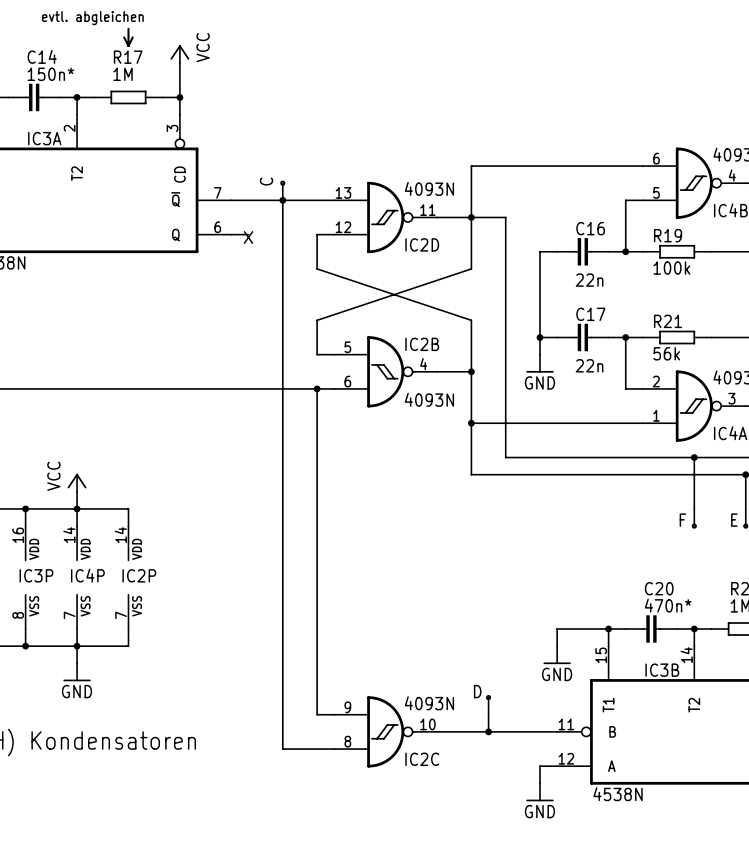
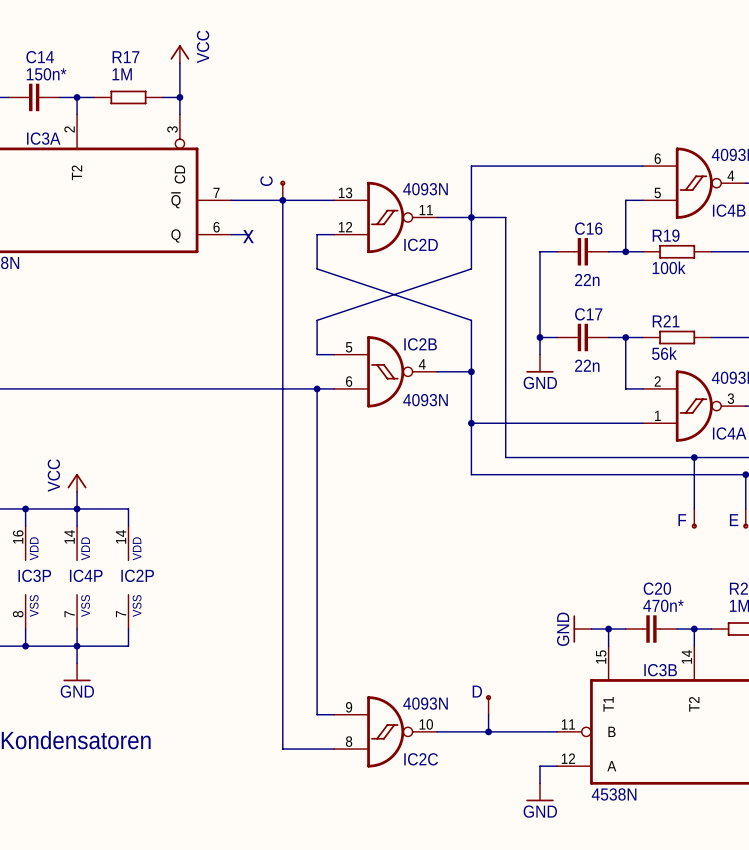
text: evtl. abgleichen (92, 18) -> none
line: (128, 28) (128, 46) -> none
line: (124, 37) (128, 46) -> none
line: (132, 37) (128, 46) -> none
power symbol position: GND (557, 655) -> GND (582, 629)
power symbol rotation: 0° (557, 663) -> 90° clockwise (574, 629)

